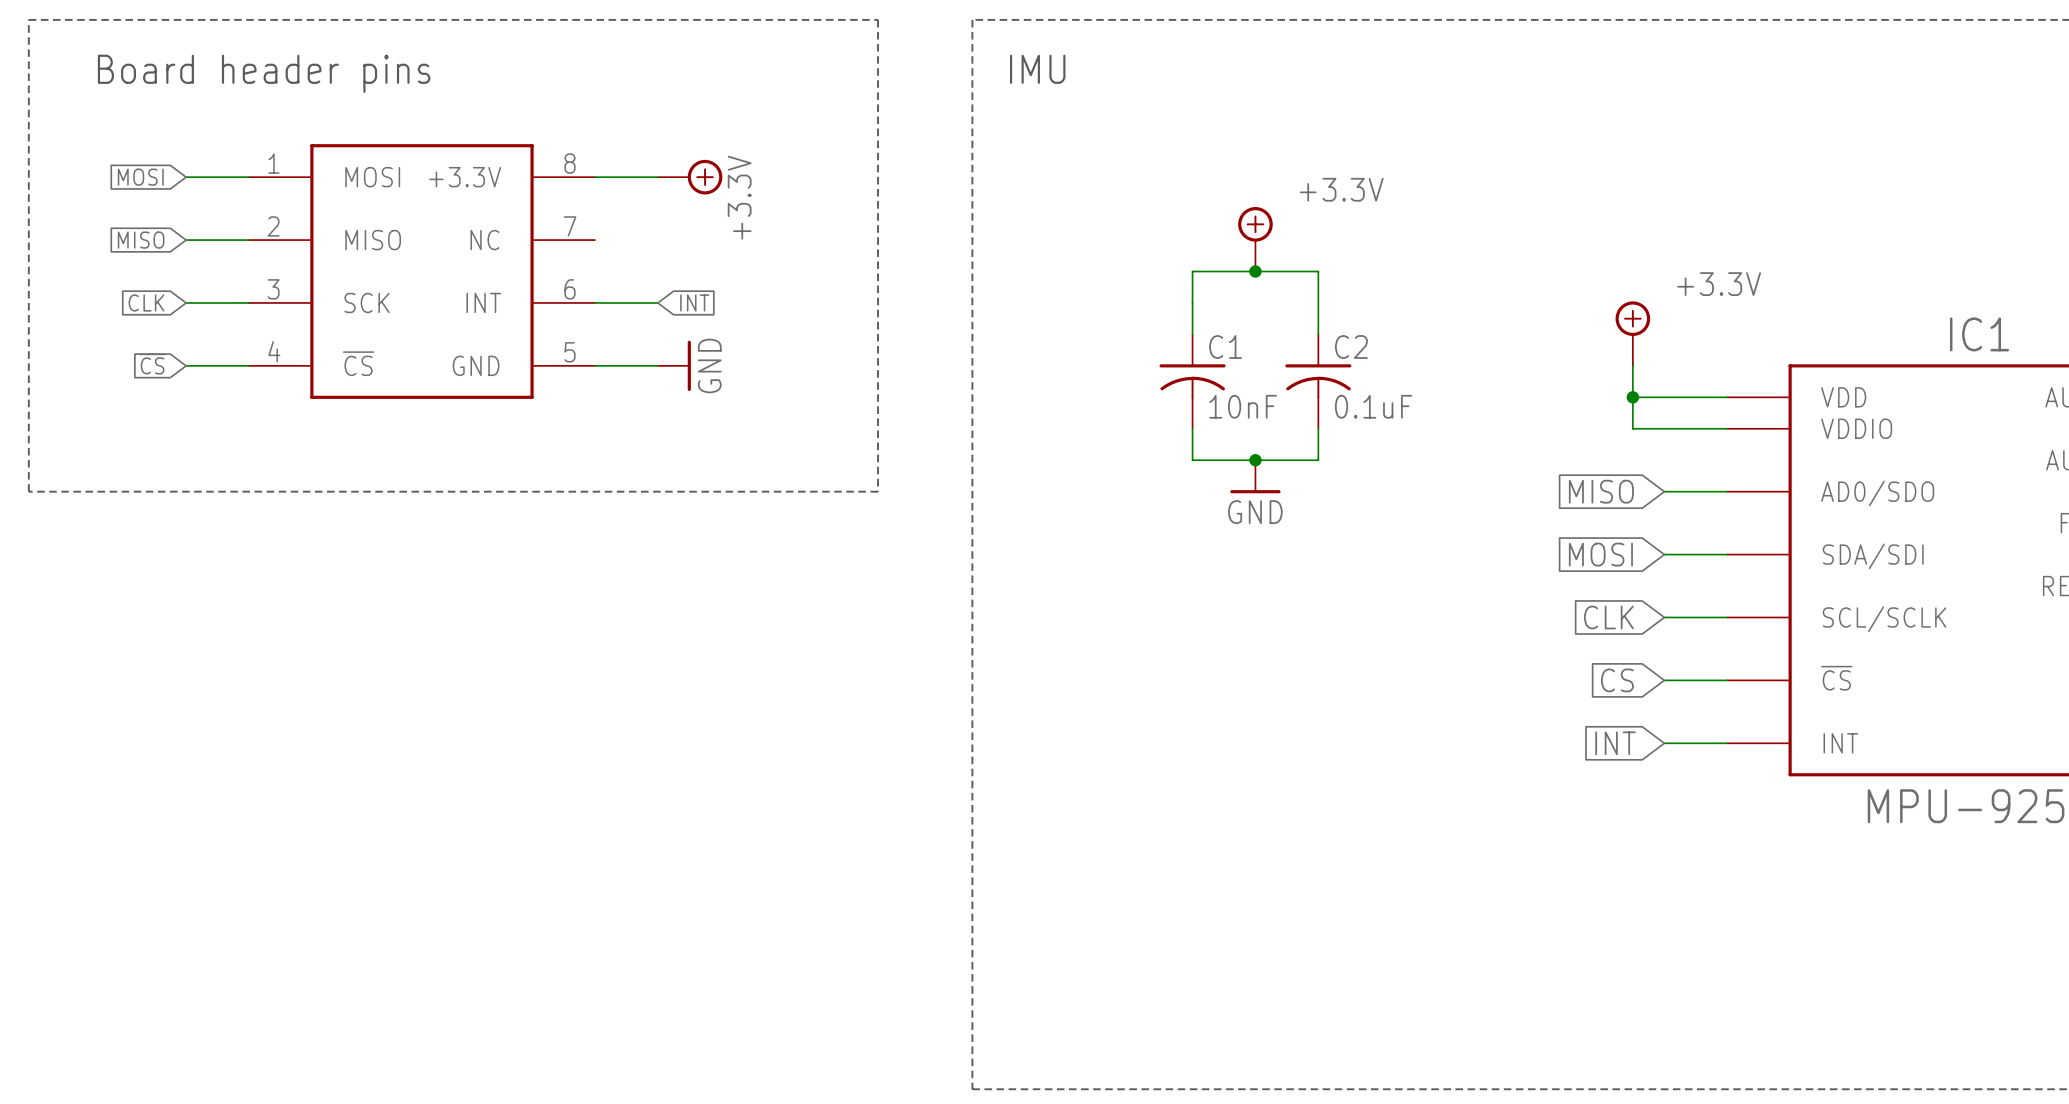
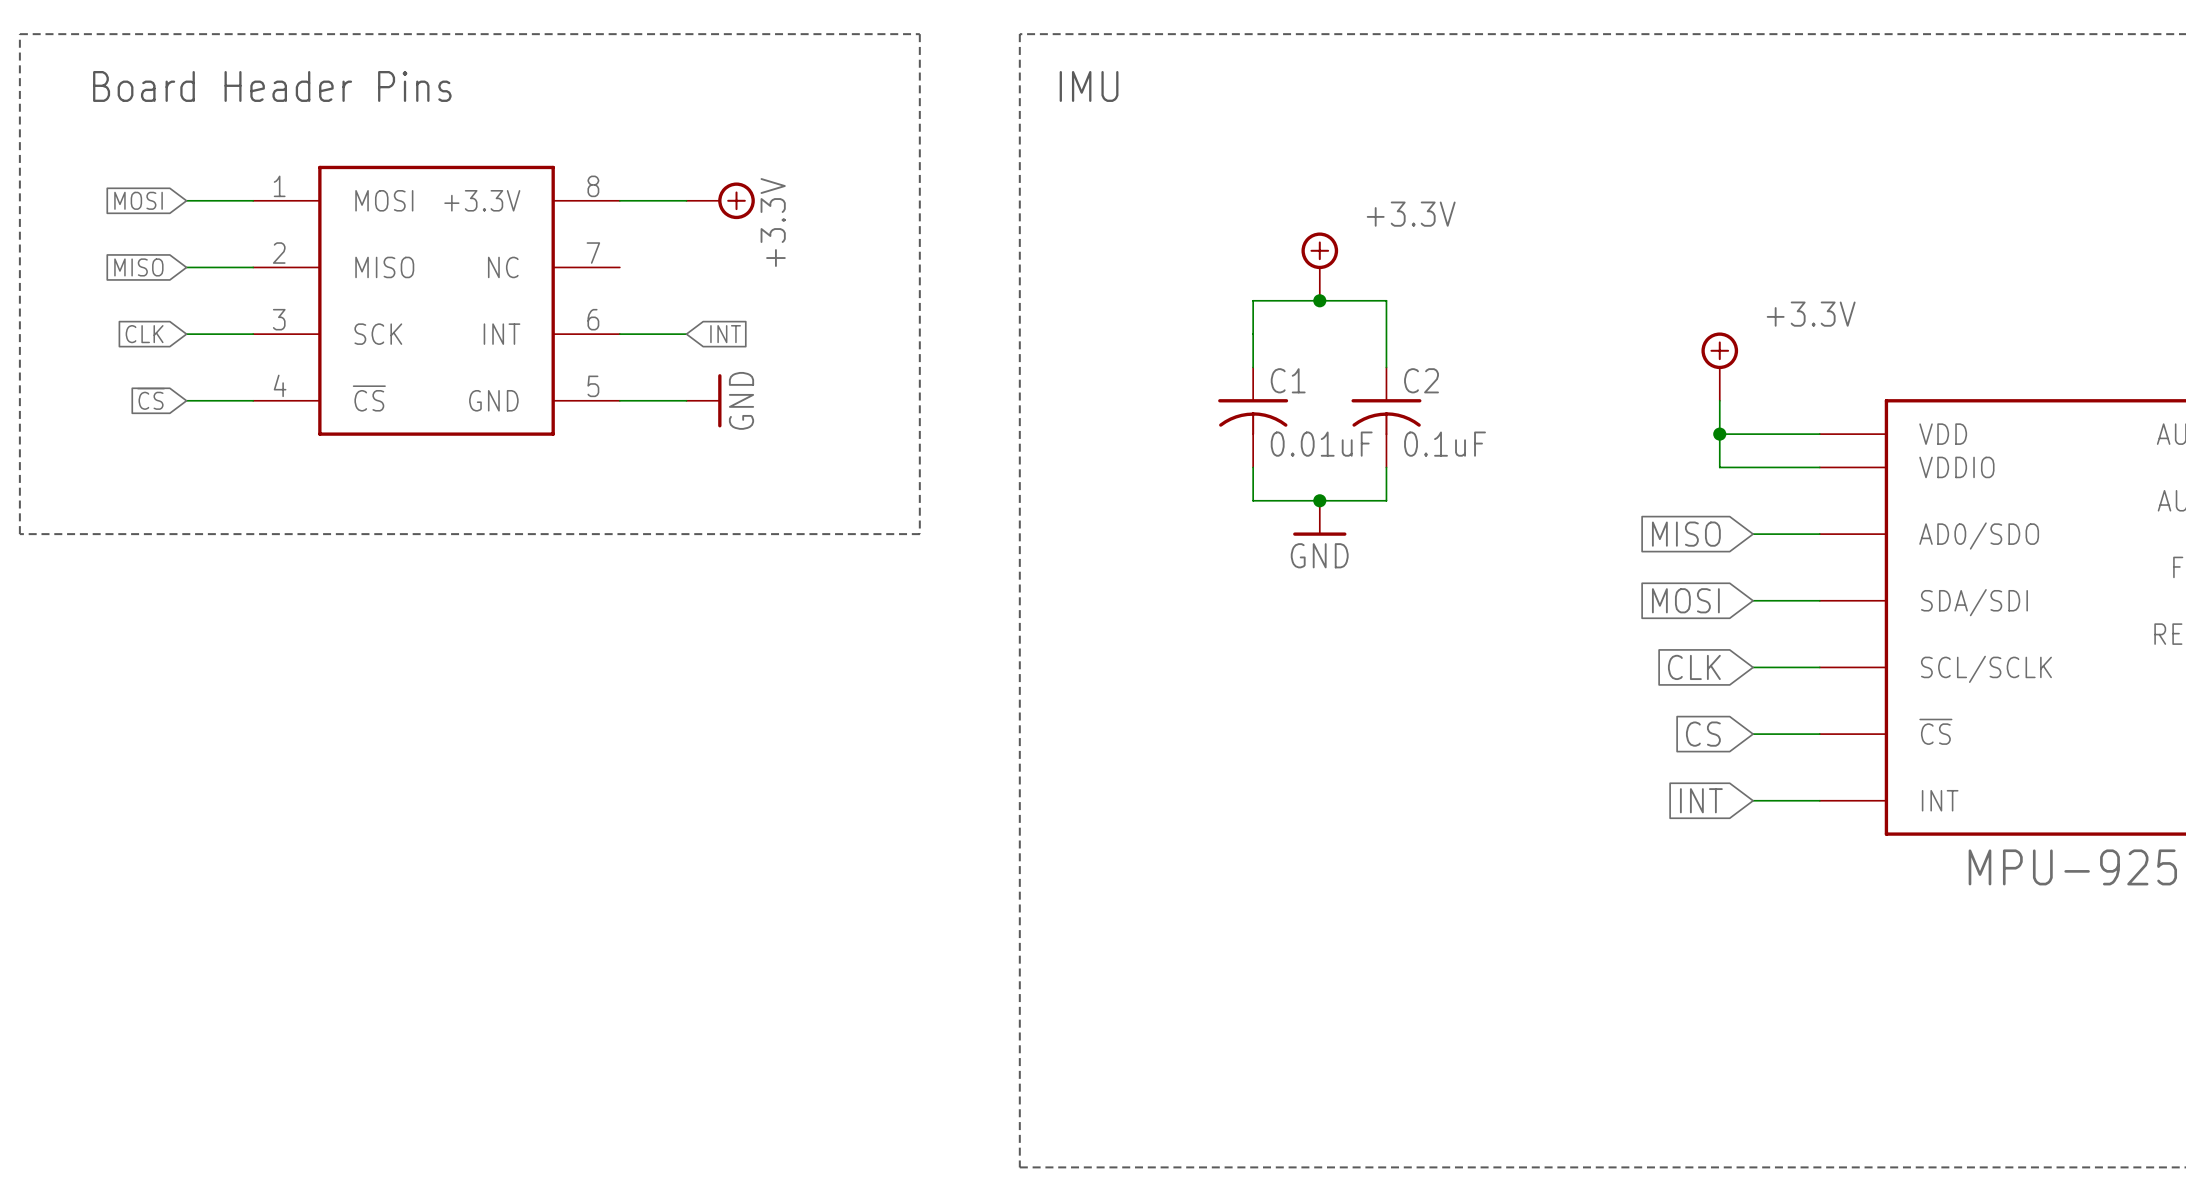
text: Board header pins (264, 73) -> Board Header Pins (272, 86)
IC1 name: IC1 (1979, 334) -> none
C1 value: 10nF (1243, 406) -> 0.01uF (1321, 444)

